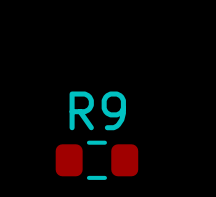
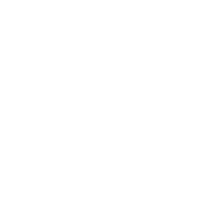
R9: (96, 160) -> none

